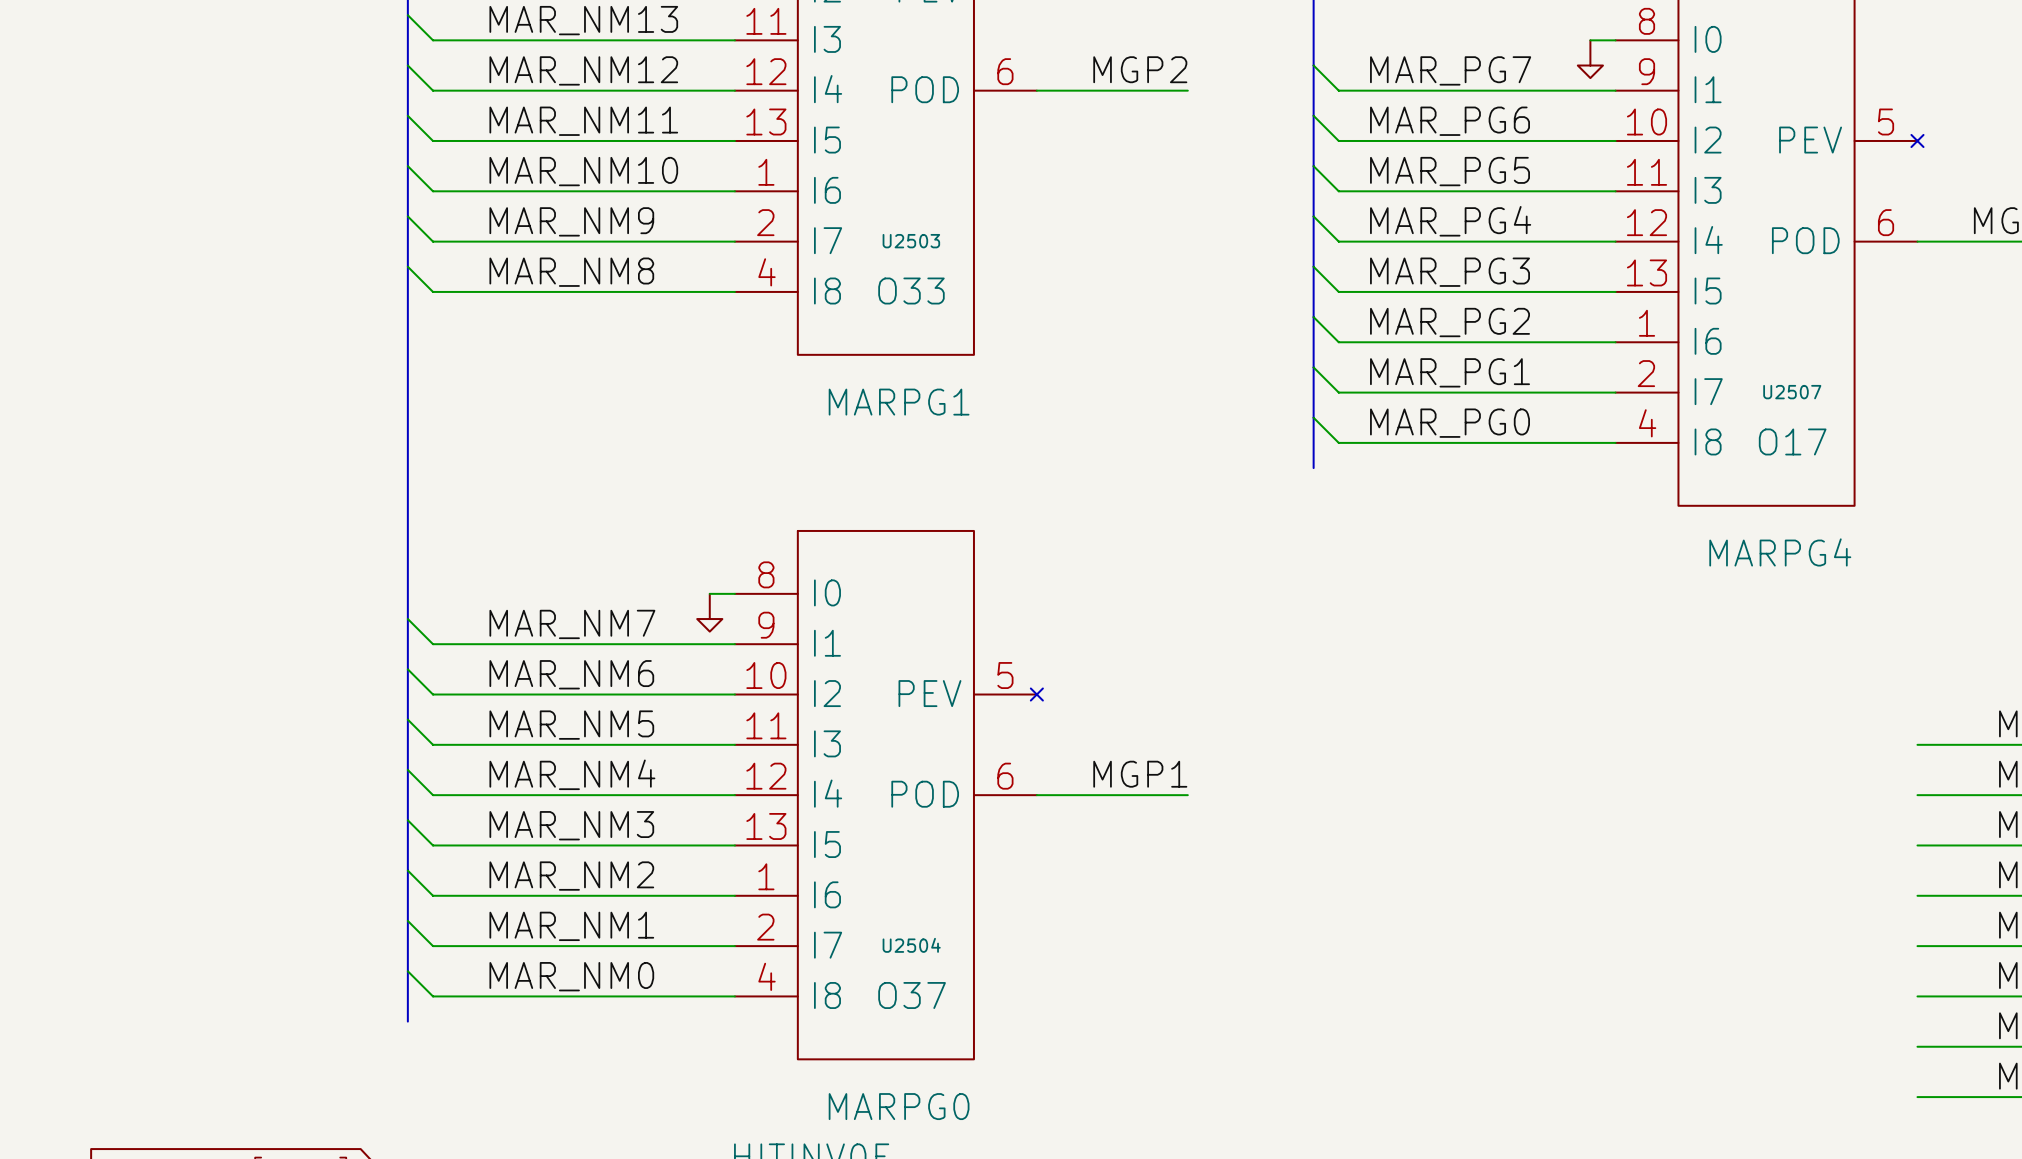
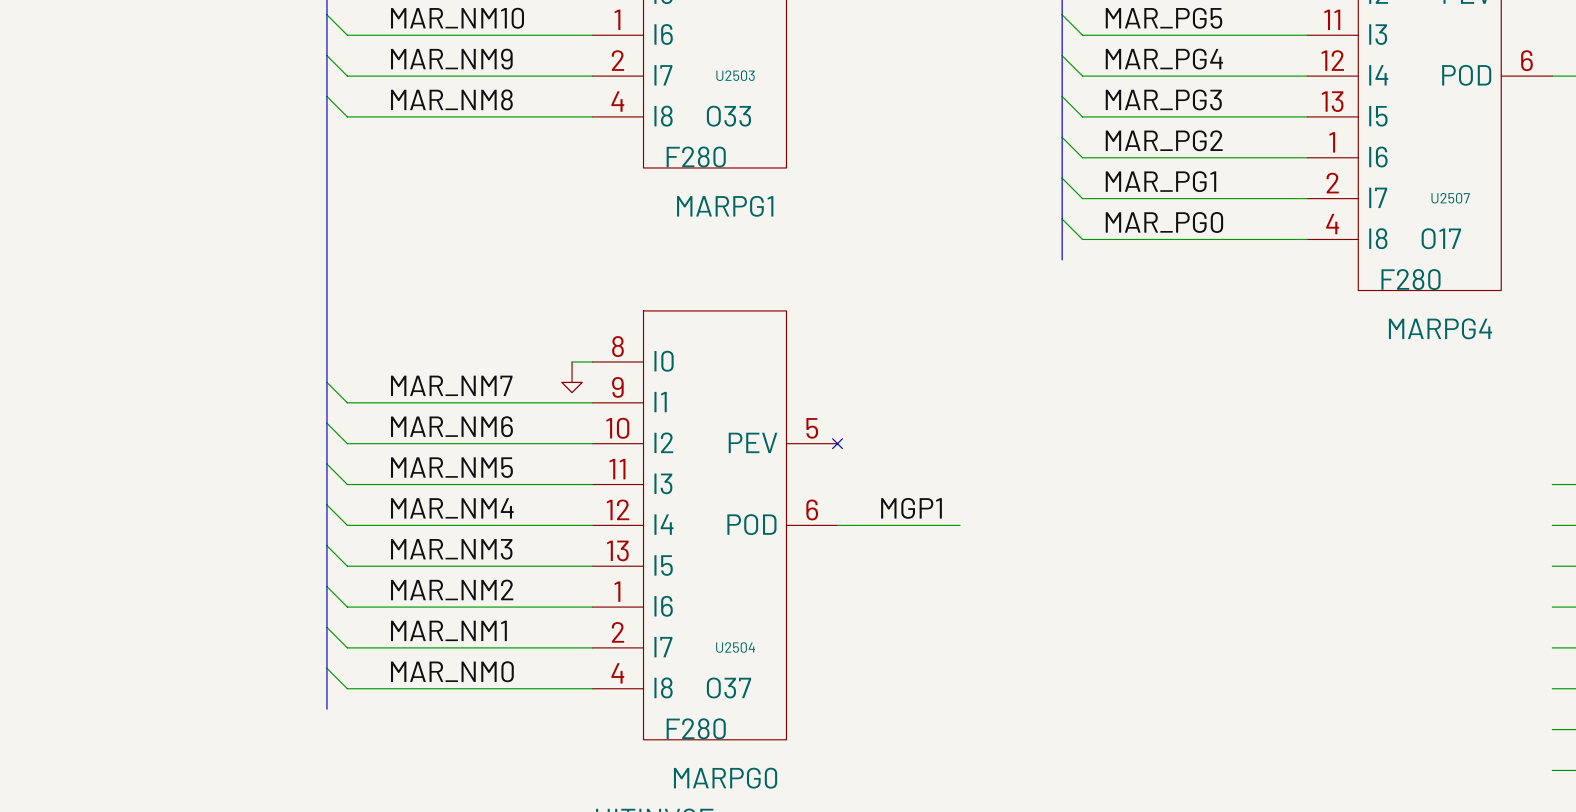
U2503 value: none -> F280 (696, 157)
U2507 value: none -> F280 (1410, 279)
U2504 value: none -> F280 (696, 728)

